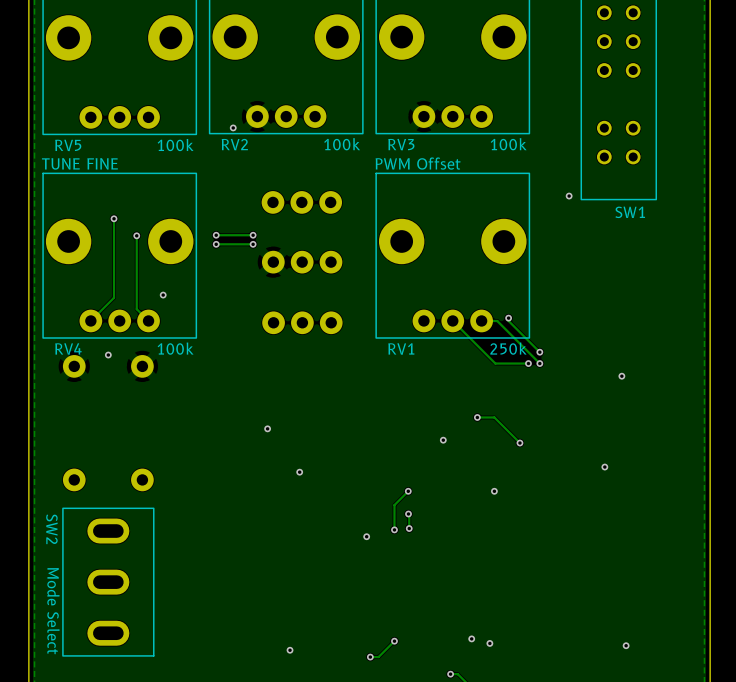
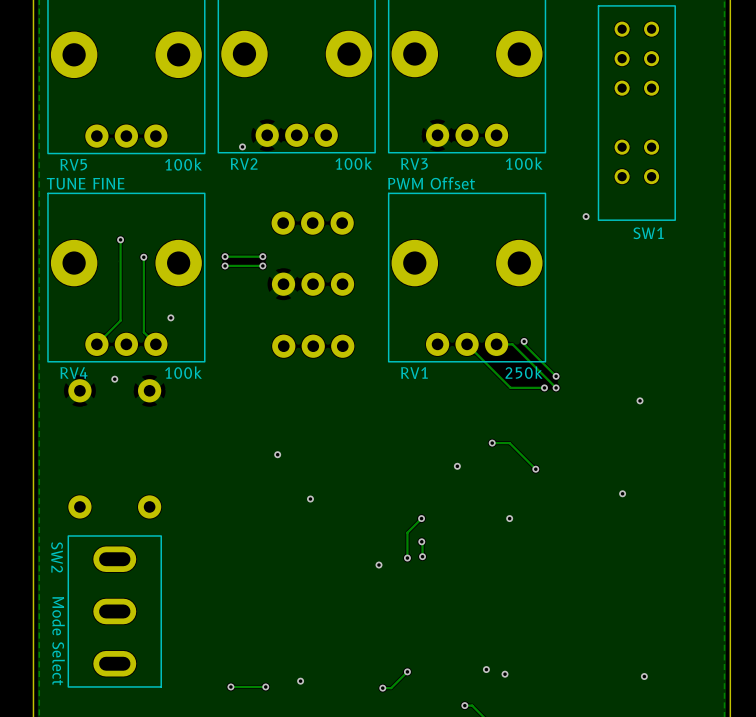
via: none -> (230, 686)
track: none -> (265, 686) (230, 686)
via: none -> (265, 686)

